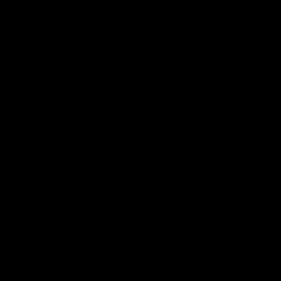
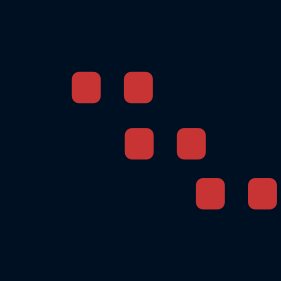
part: none -> (112, 87)
part: none -> (165, 143)
part: none -> (236, 193)

